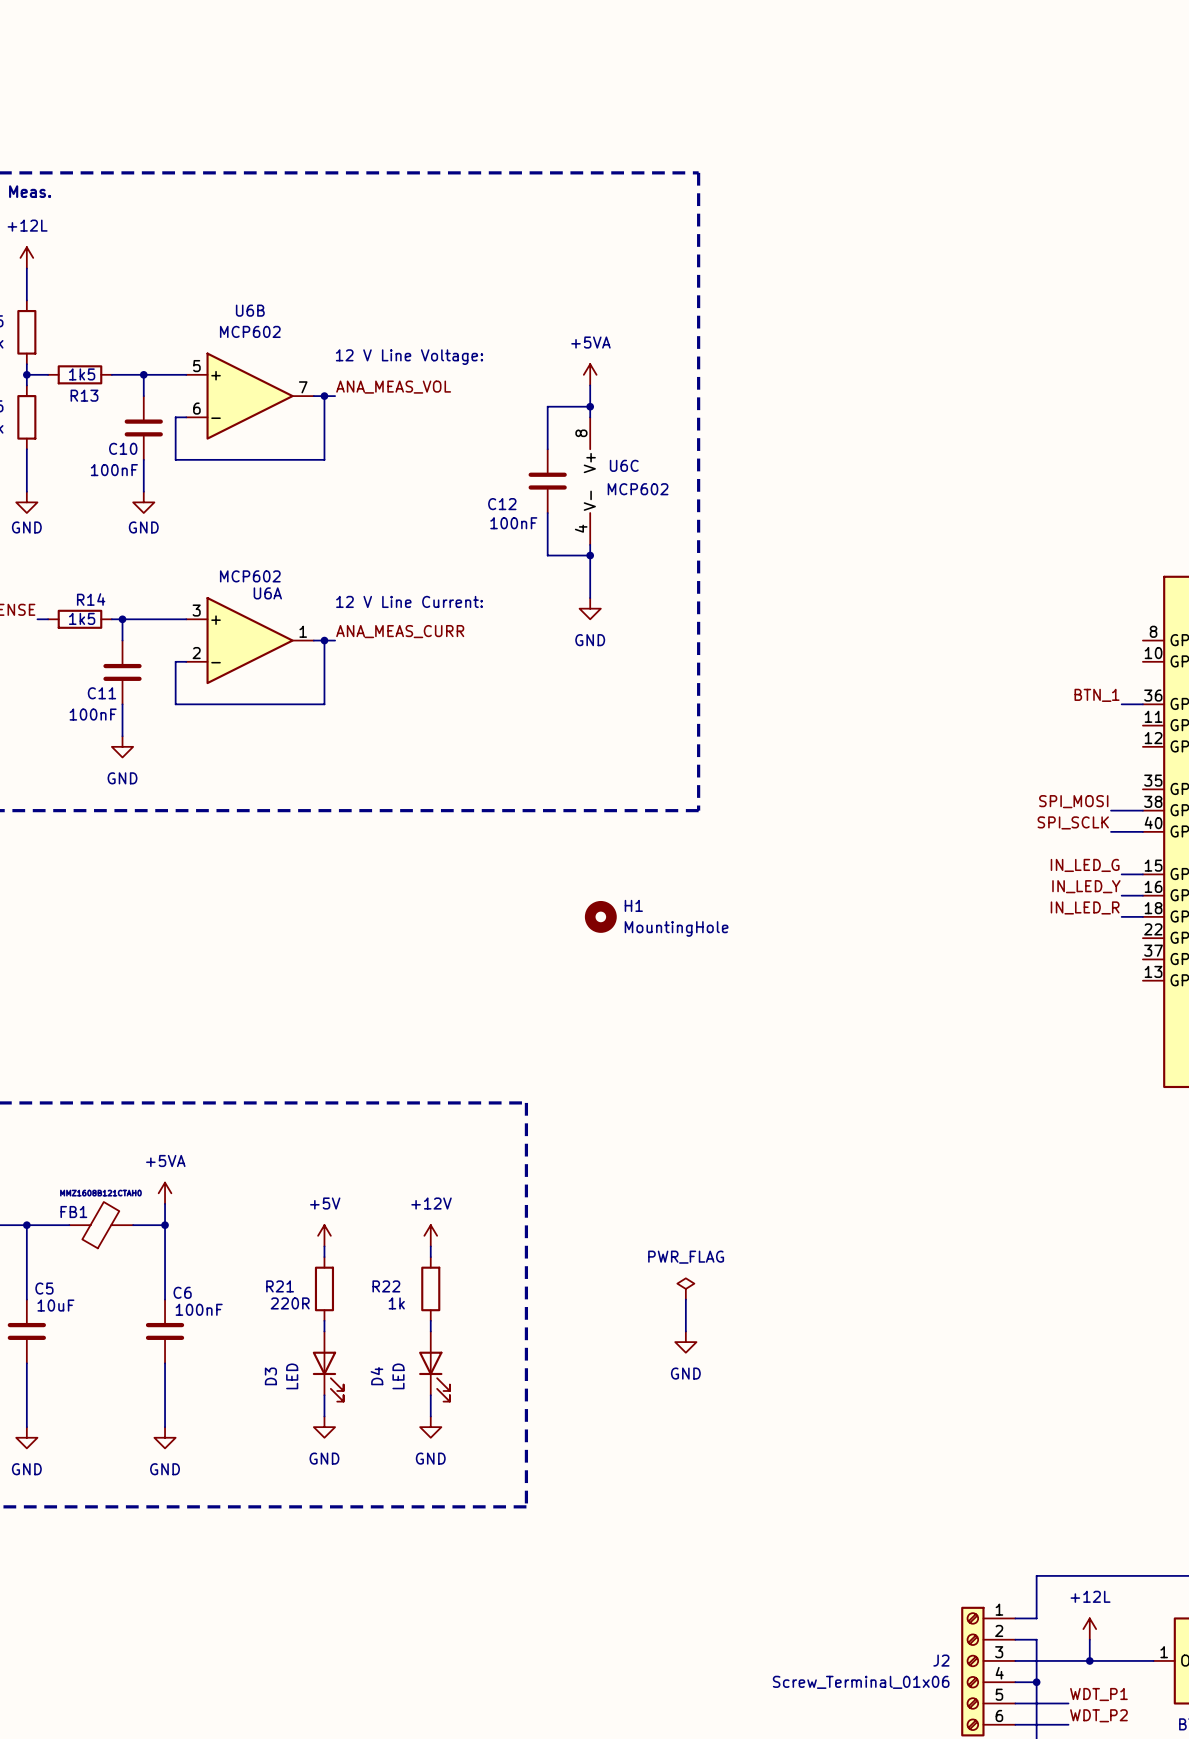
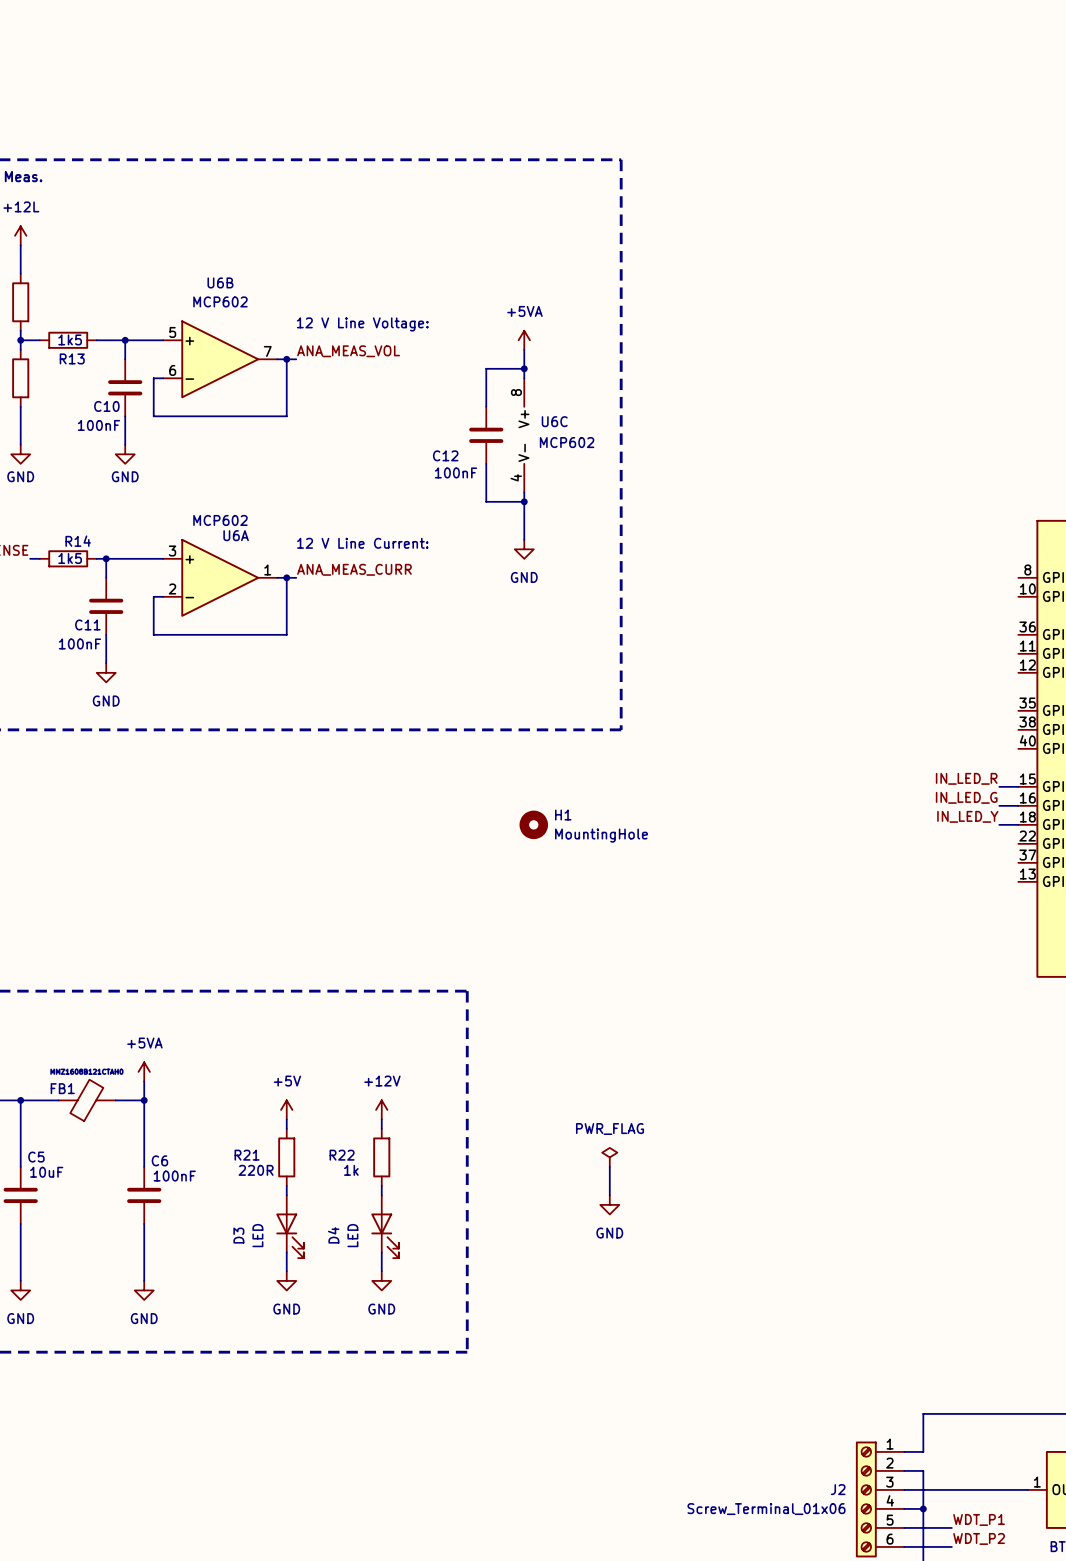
label: BTN_1 (1097, 695) -> none
wire: (1121, 704) (1142, 704) -> none
label: SPI_MOSI (1073, 801) -> none
wire: (1111, 810) (1142, 810) -> none
label: SPI_SCLK (1073, 822) -> none
wire: (1111, 831) (1142, 831) -> none
label: IN_LED_G (1085, 865) -> IN_LED_R (966, 778)
label: IN_LED_Y (1086, 886) -> IN_LED_G (966, 797)
label: IN_LED_R (1085, 907) -> IN_LED_Y (967, 816)
power symbol: +12L (1089, 1629) -> none
wire: (1089, 1639) (1089, 1660) -> none
junction: (1089, 1660) -> none

